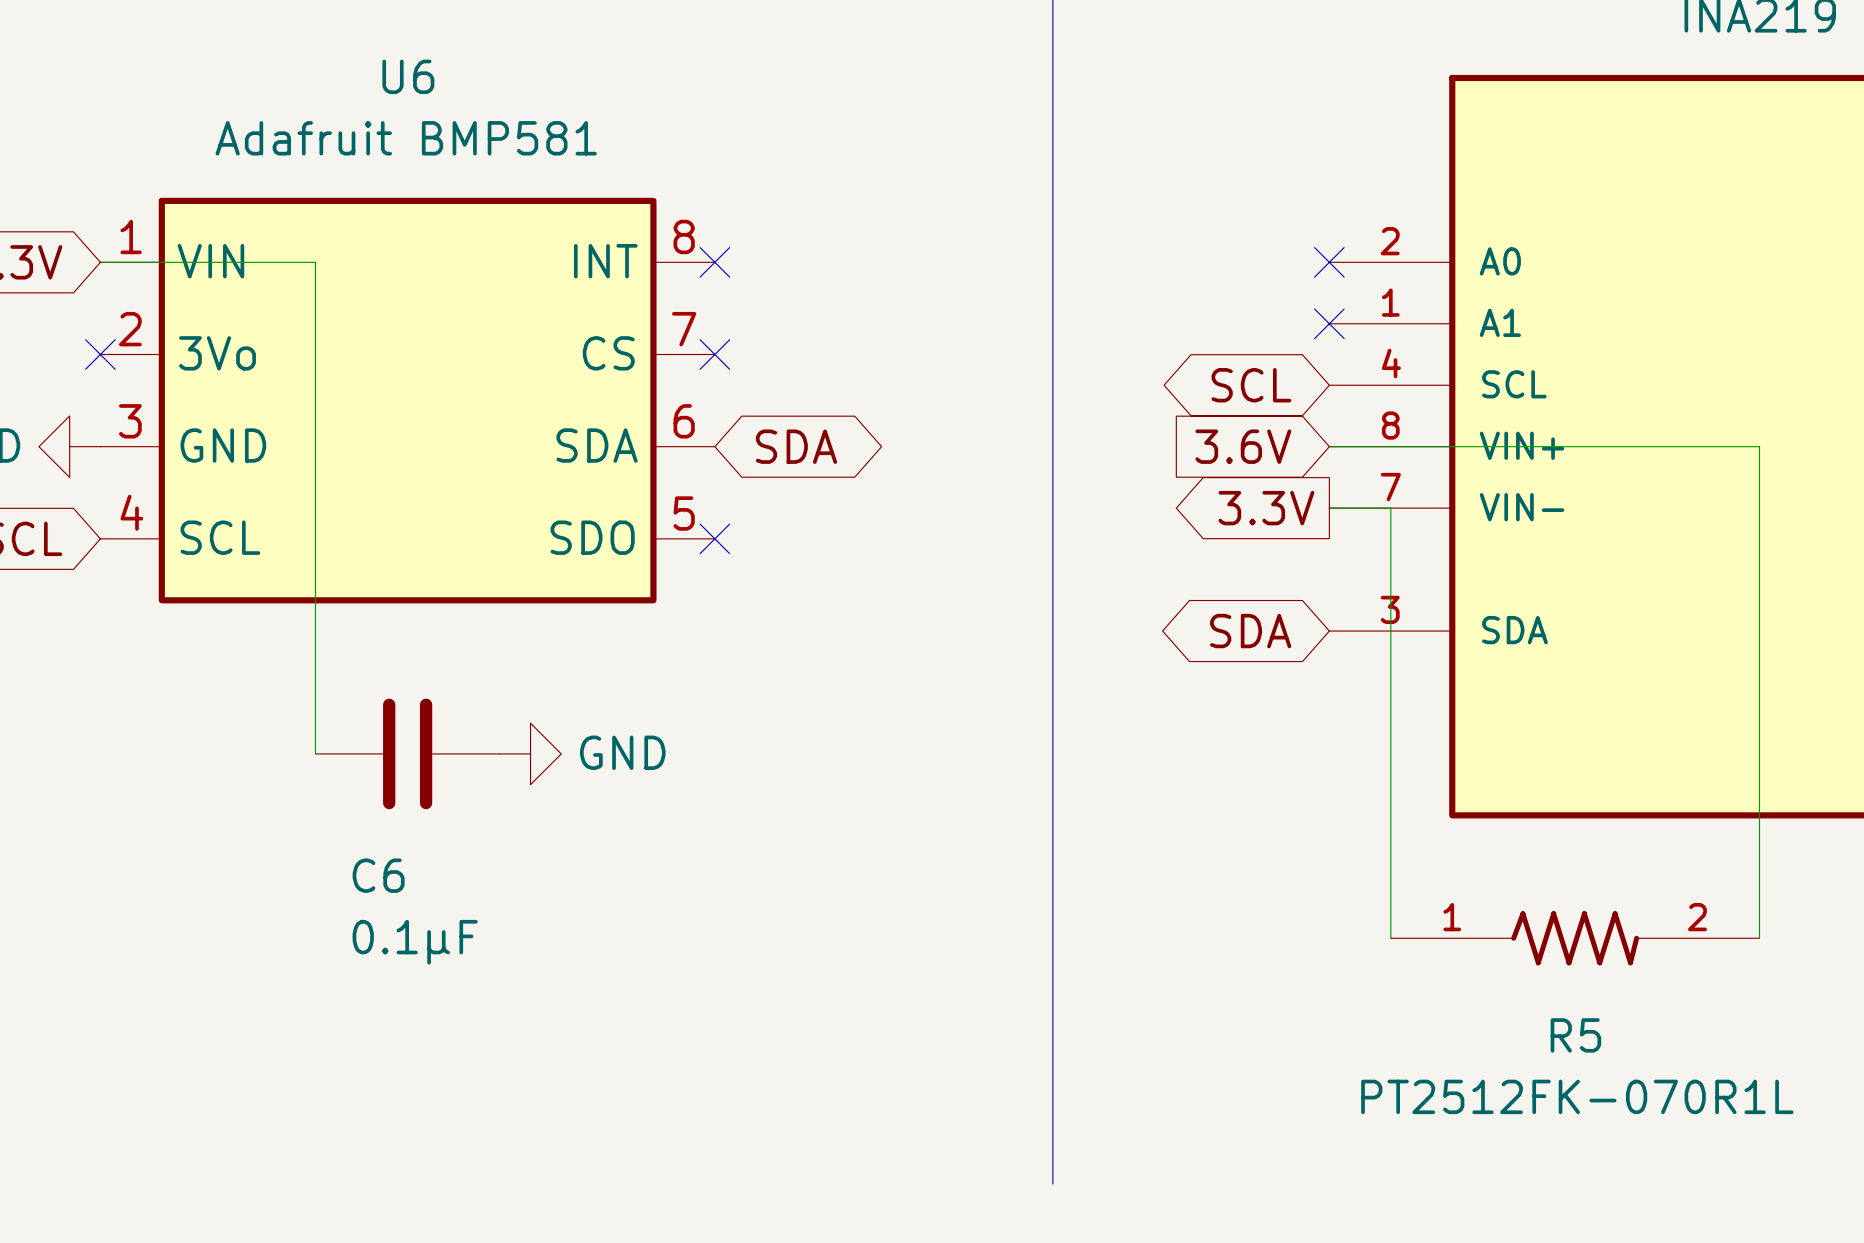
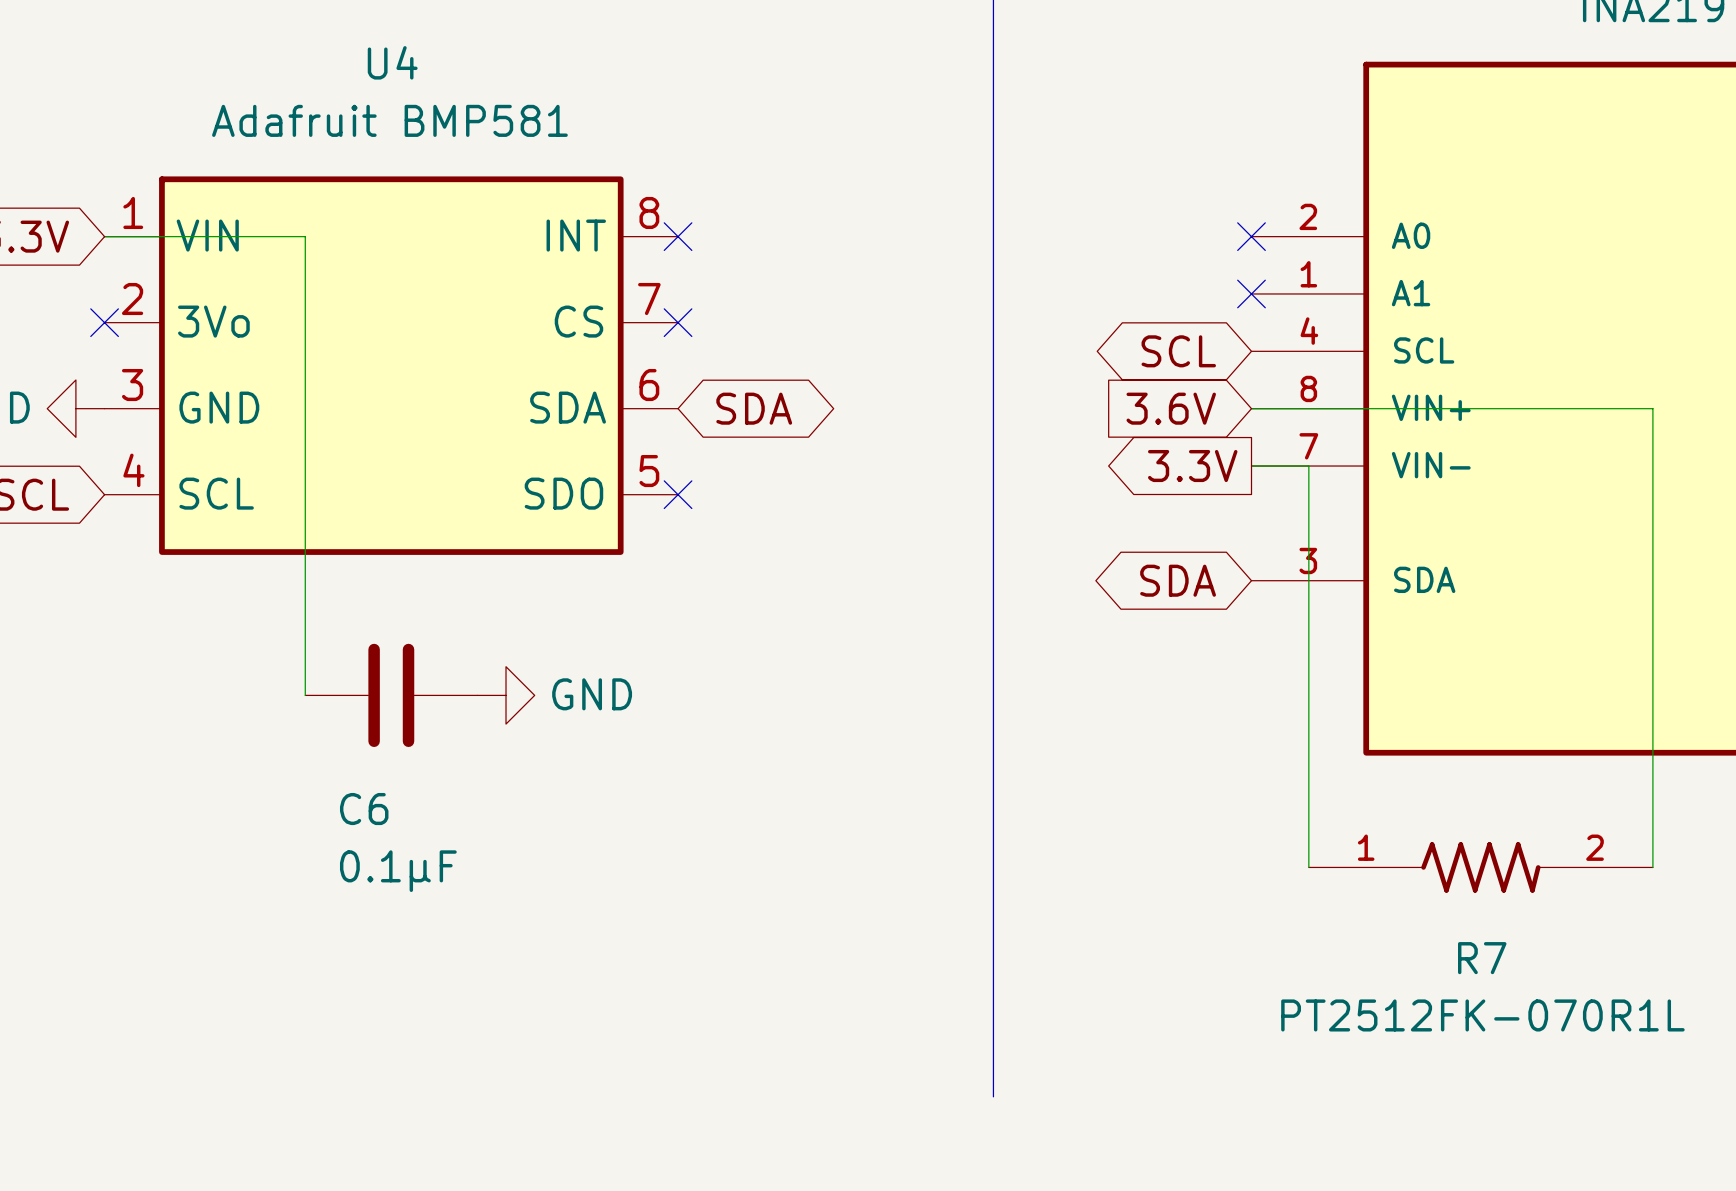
U6 name: U6 (408, 76) -> U4 (392, 62)
R5 name: R5 (1575, 1035) -> R7 (1482, 958)

